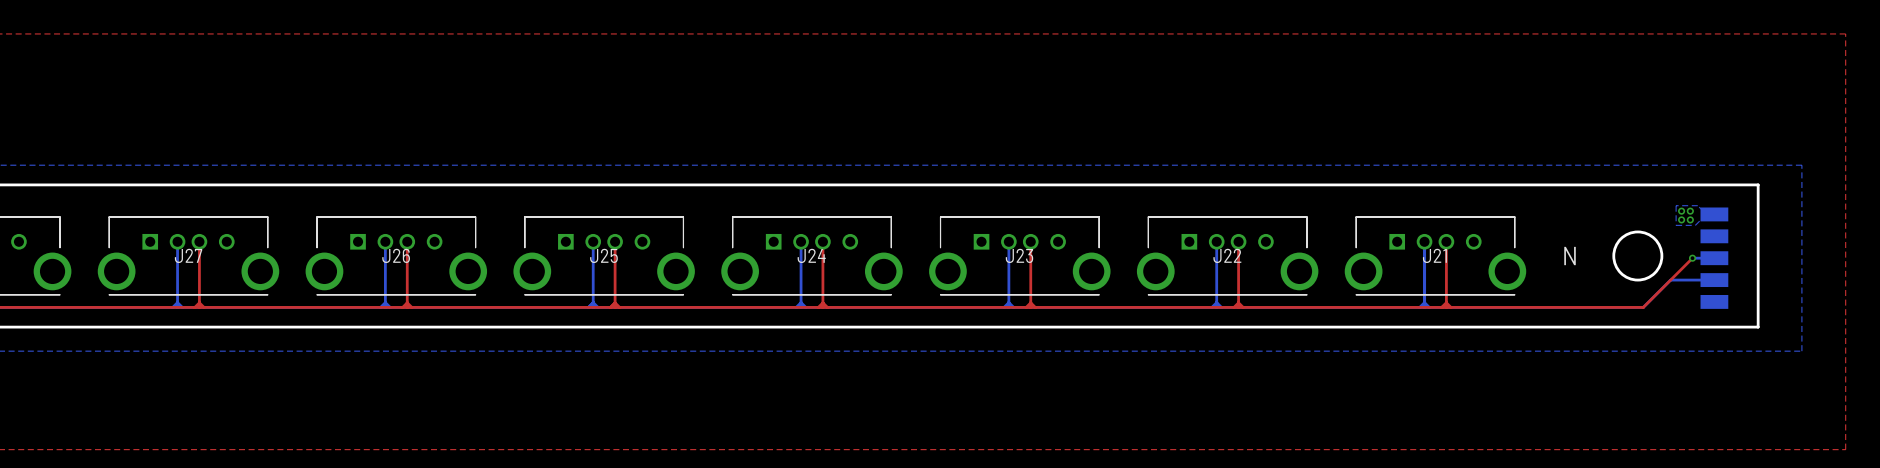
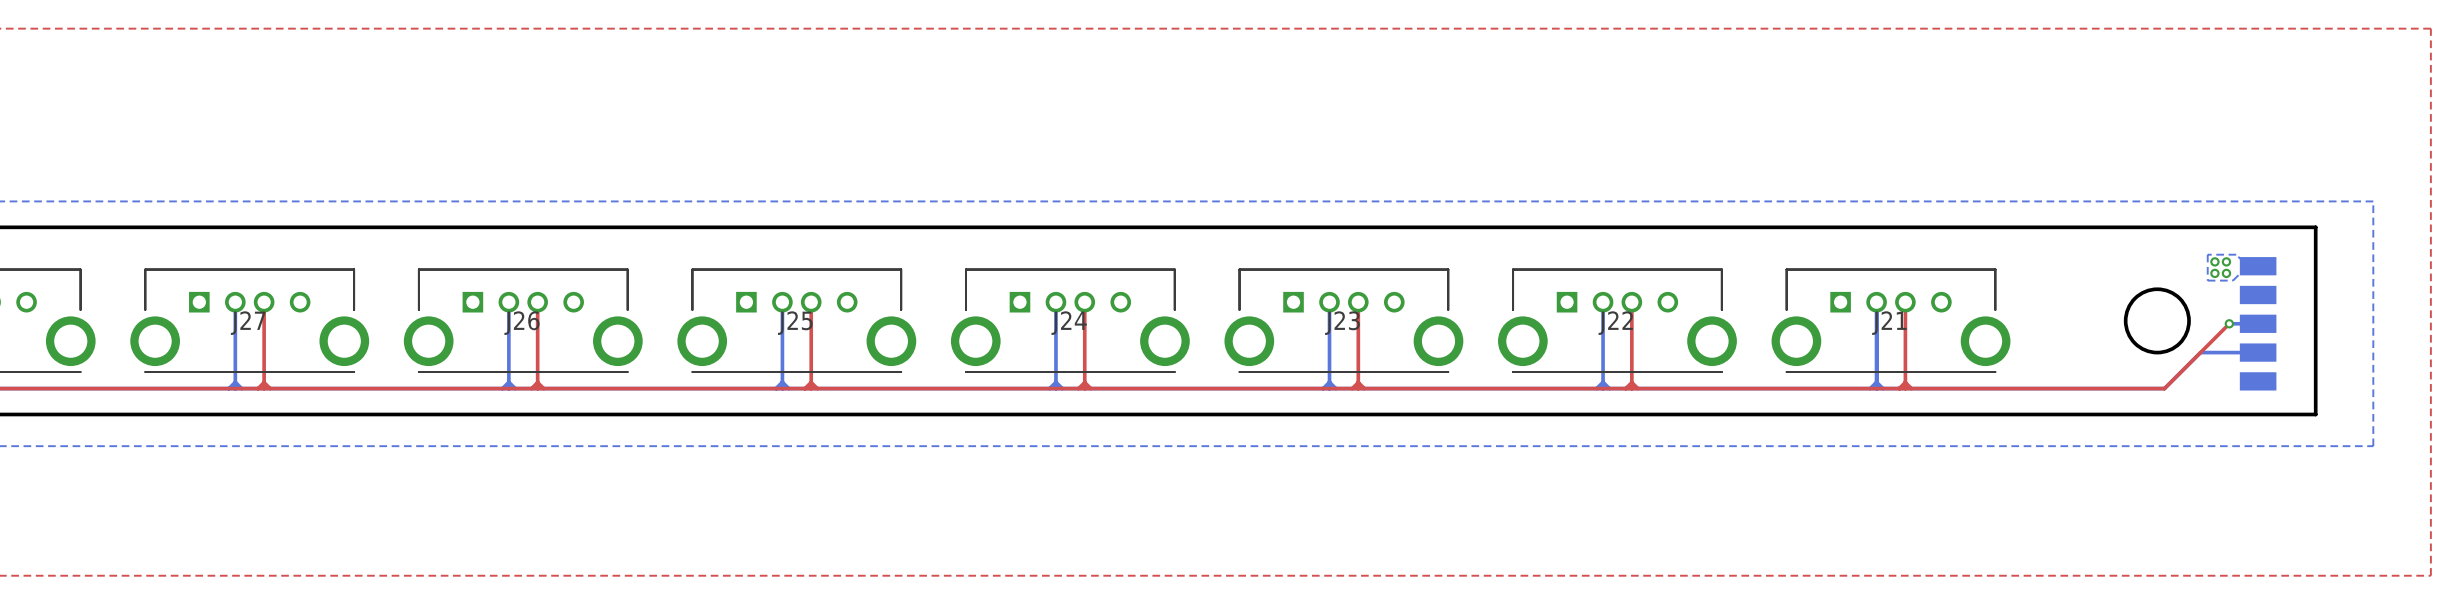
drawing: [1564, 246, 1576, 266] -> none

